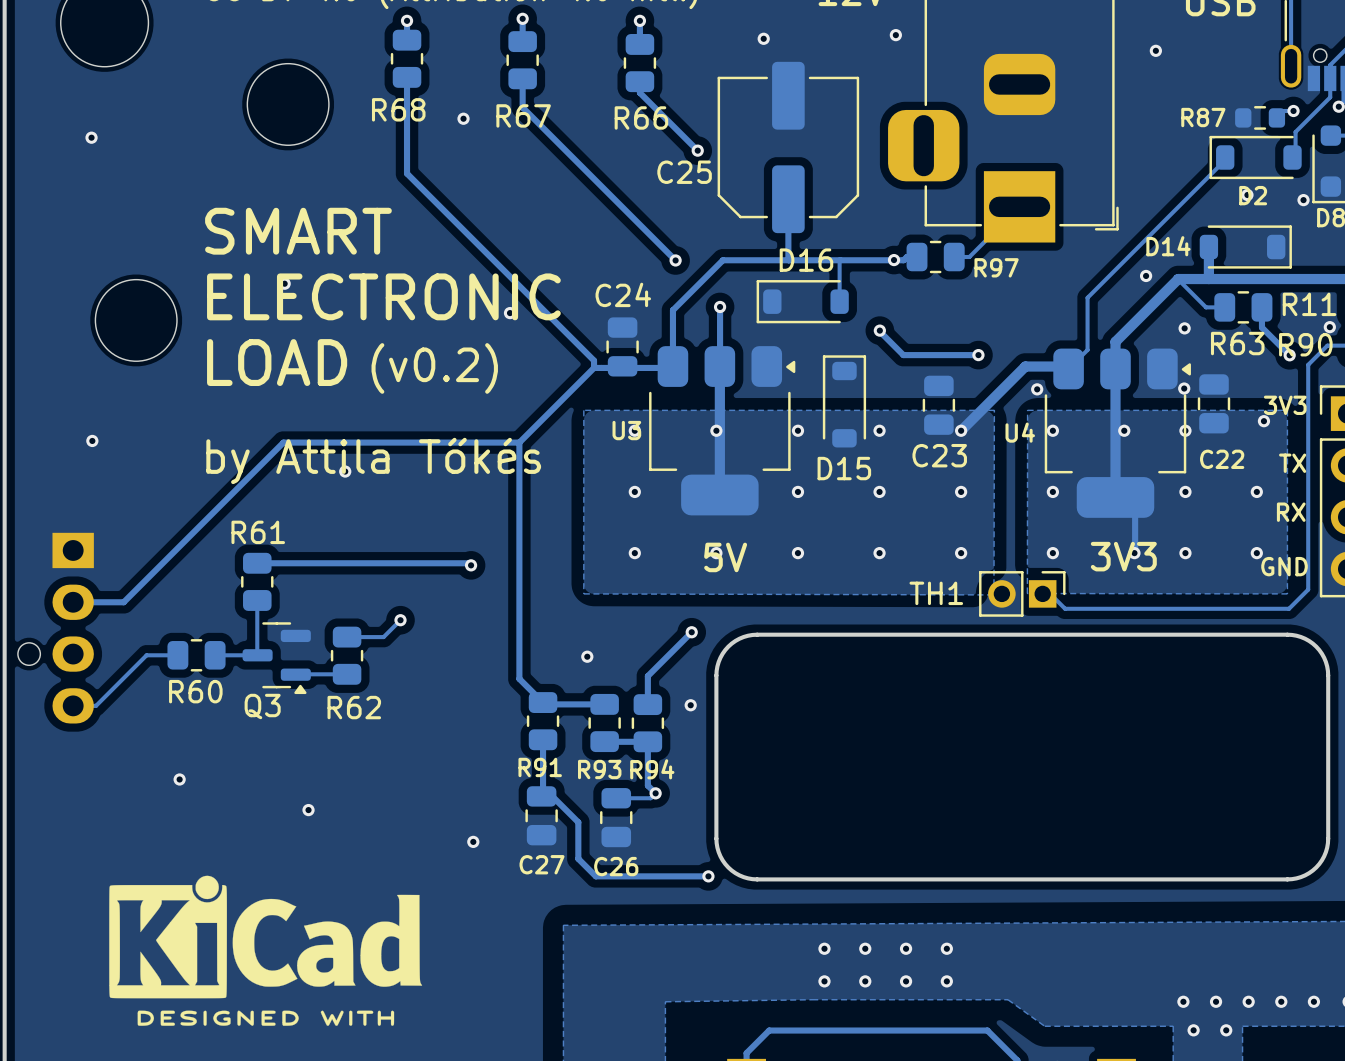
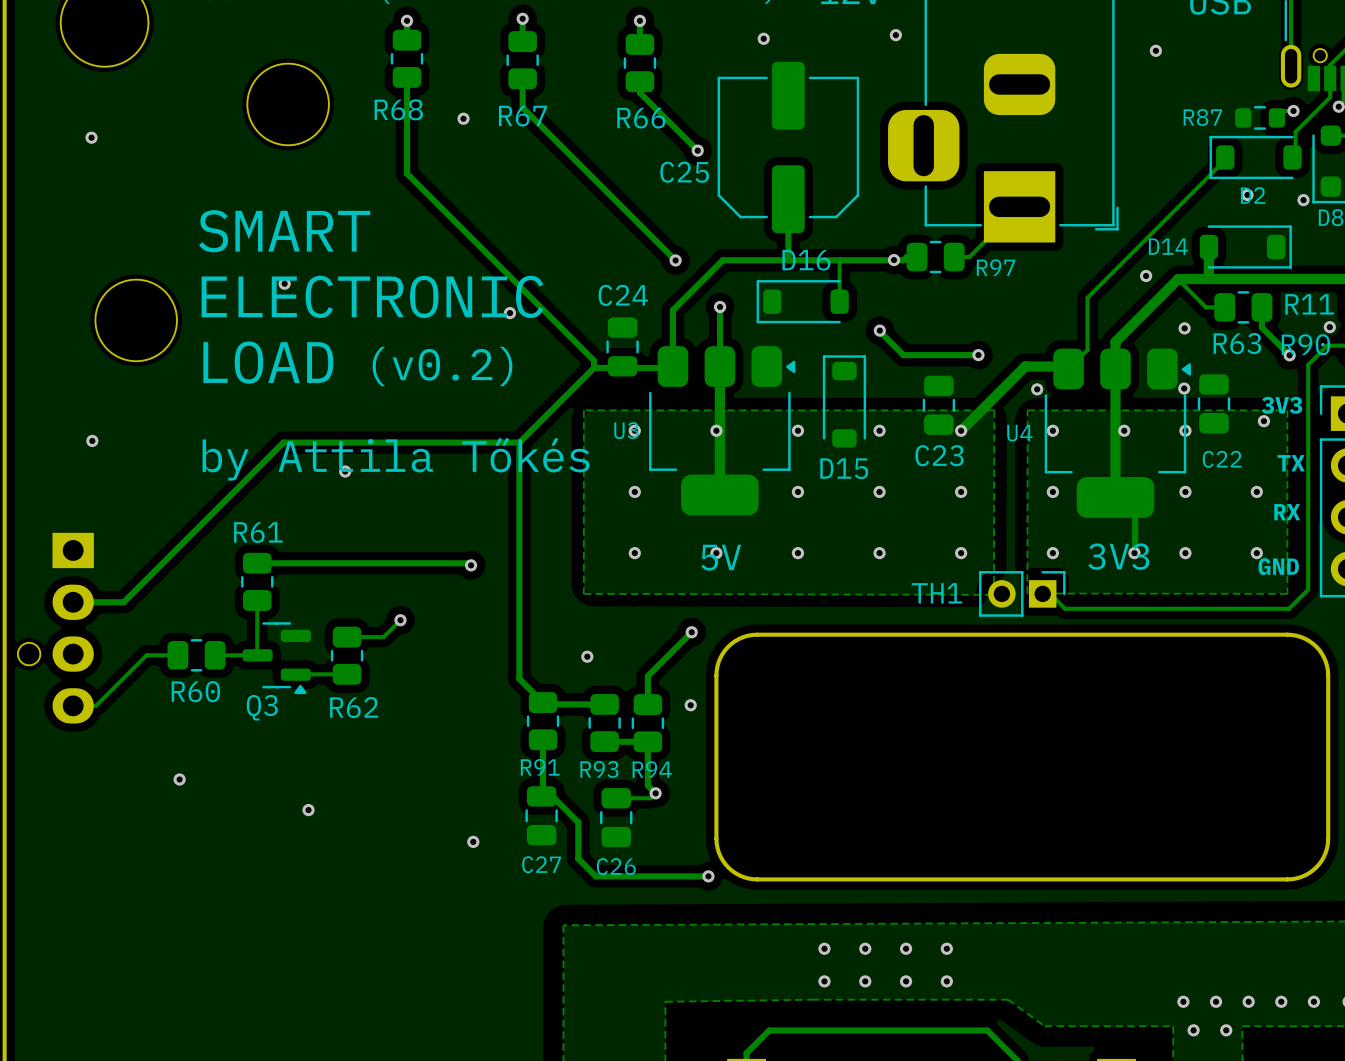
drawing: [109, 875, 423, 1026] -> none

